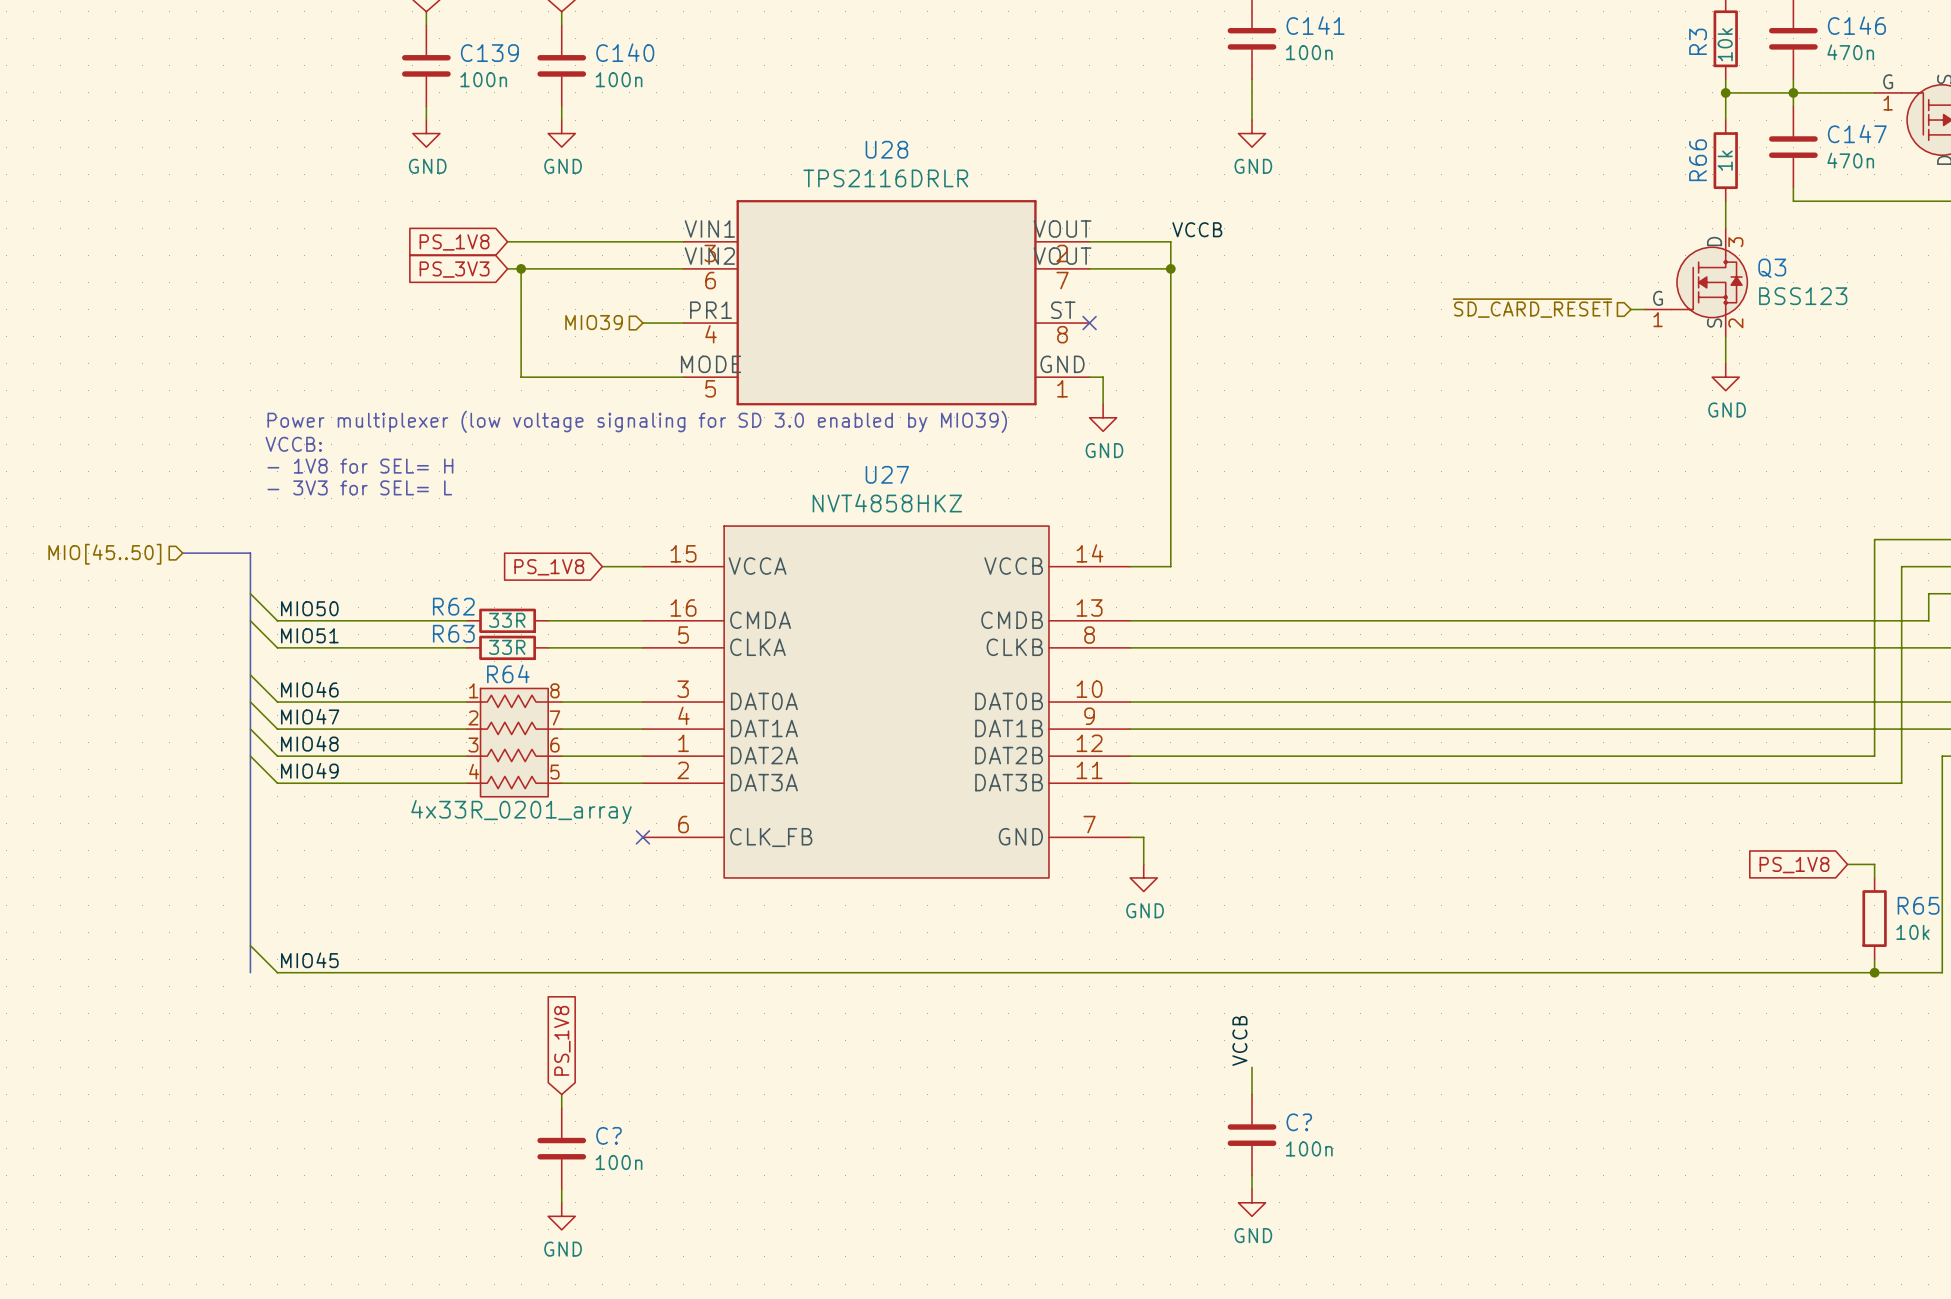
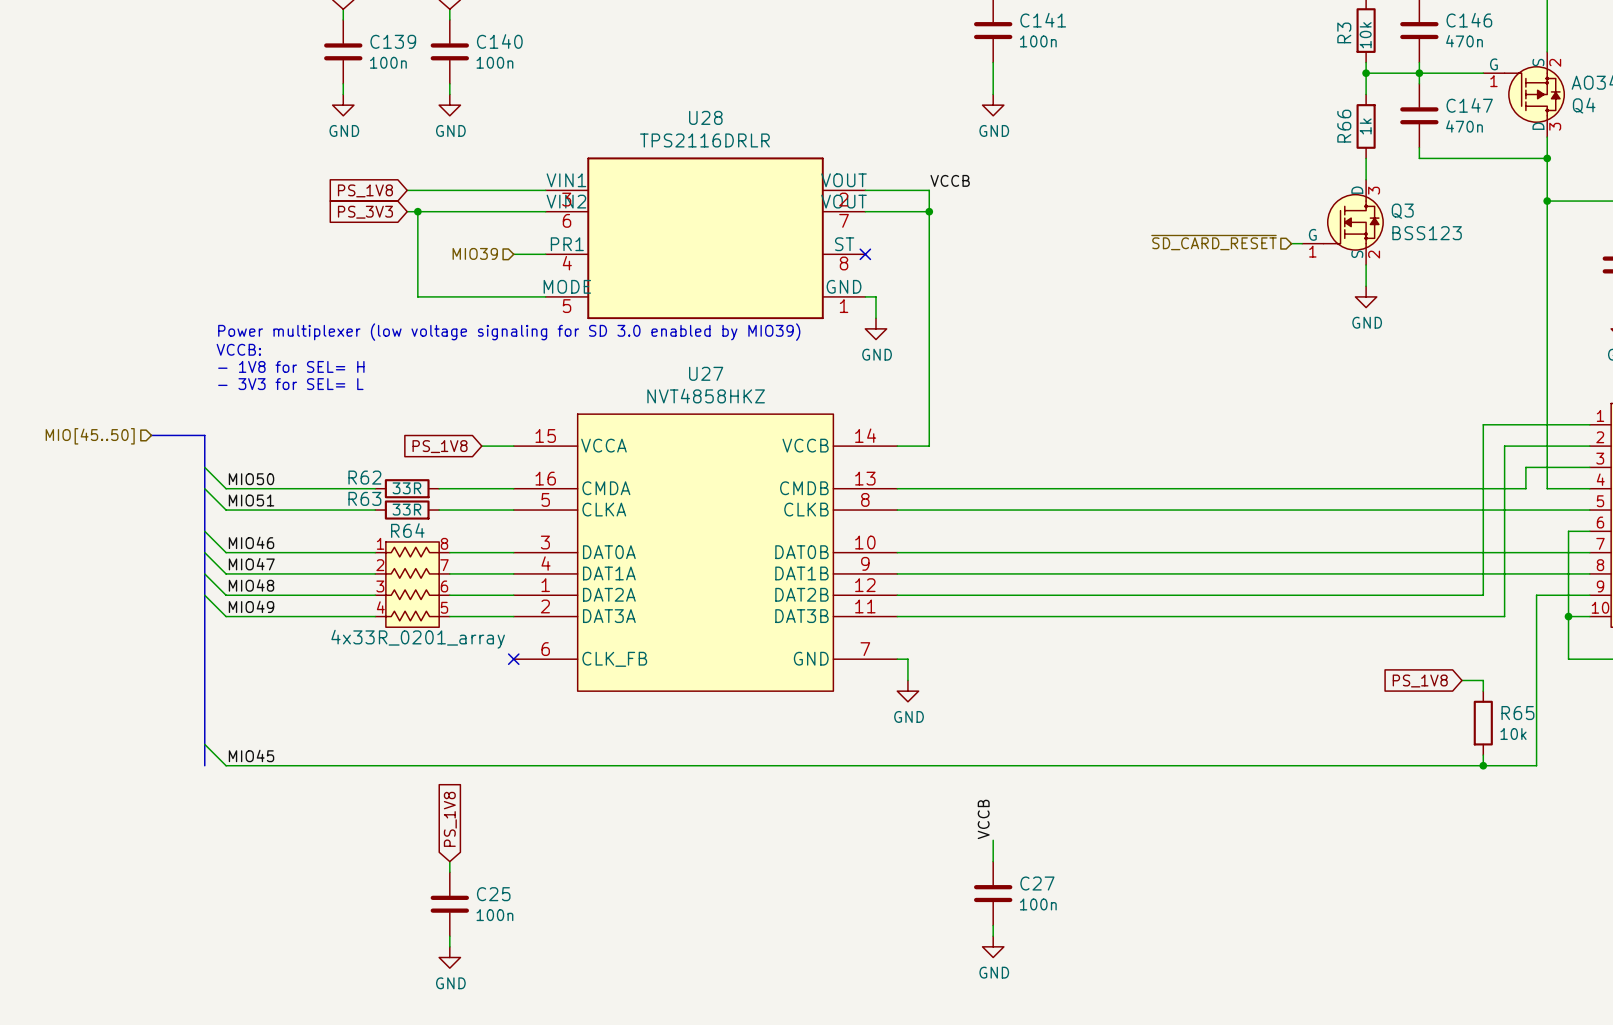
C? name: C? (1299, 1122) -> C27 (1037, 883)
C? name: C? (609, 1135) -> C25 (493, 894)

